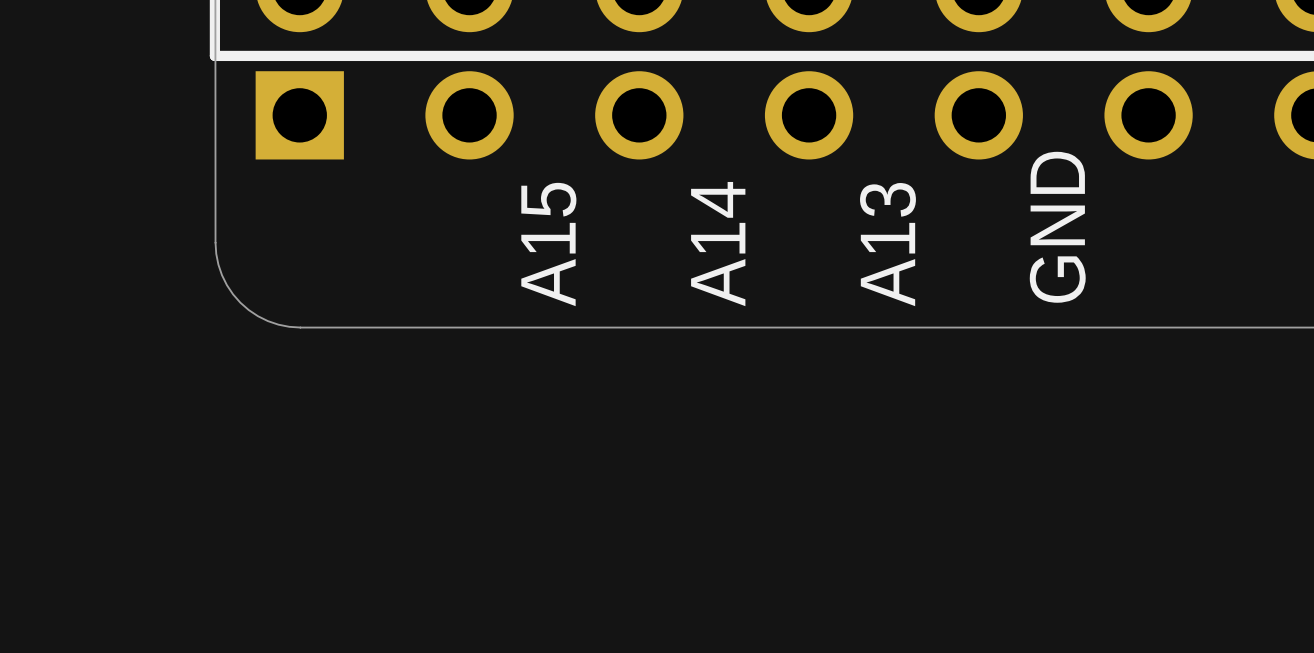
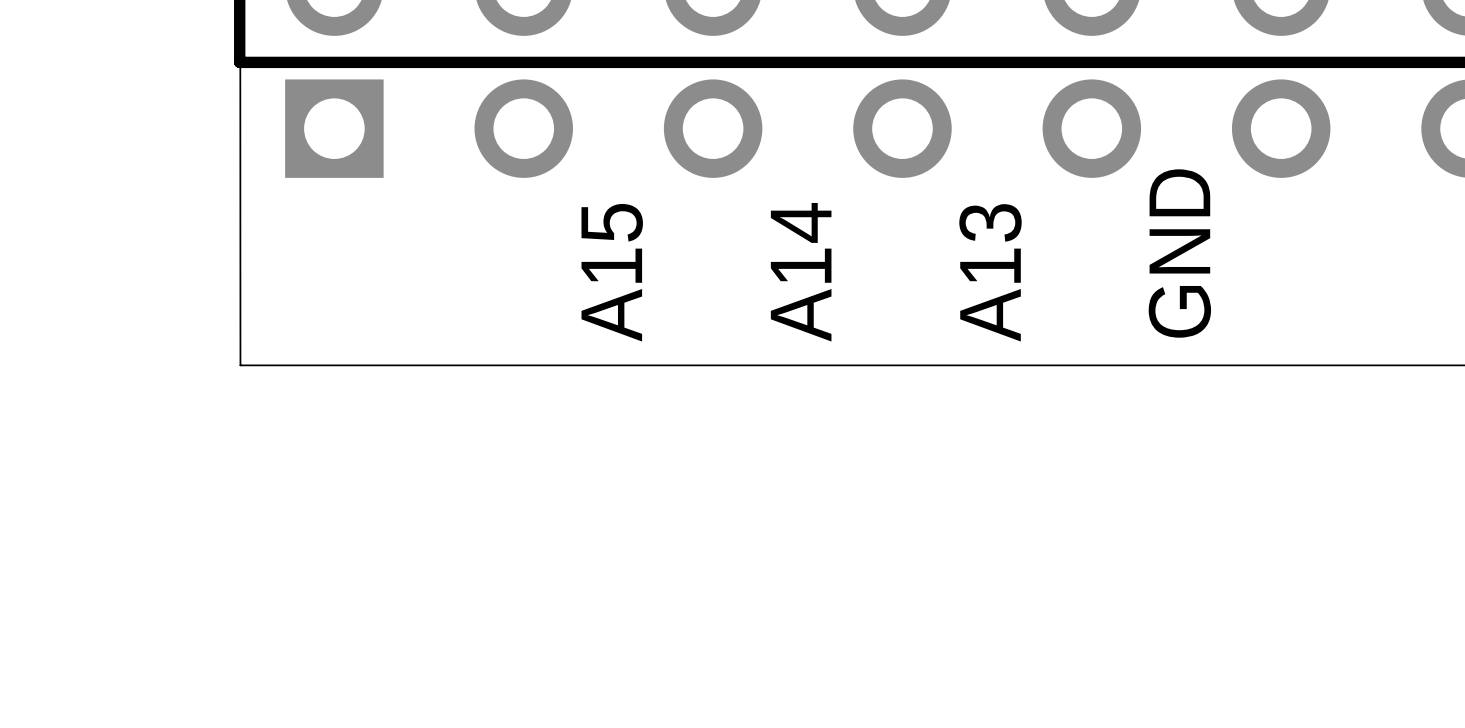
board edge: (215, 242) (222, 275) (240, 302) (267, 321) (300, 327) -> (240, 270) (240, 365) (335, 365)

